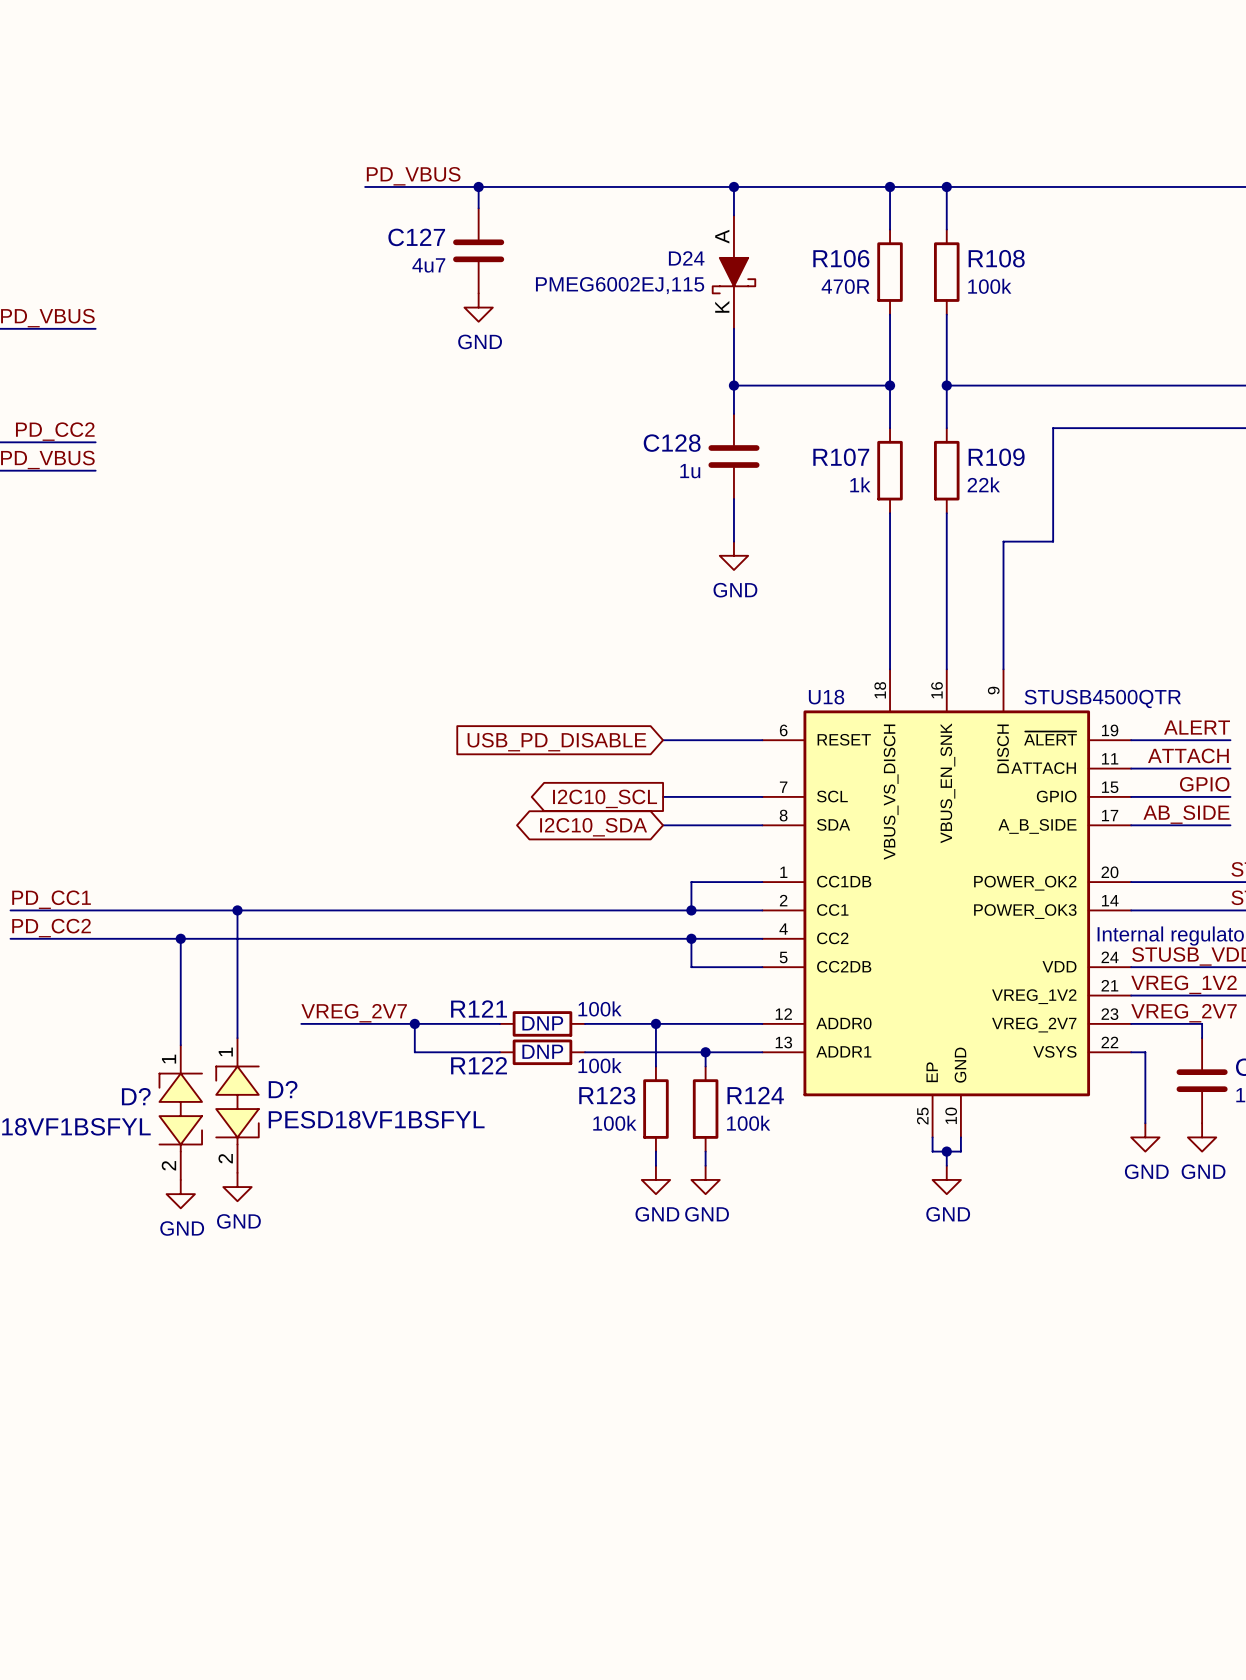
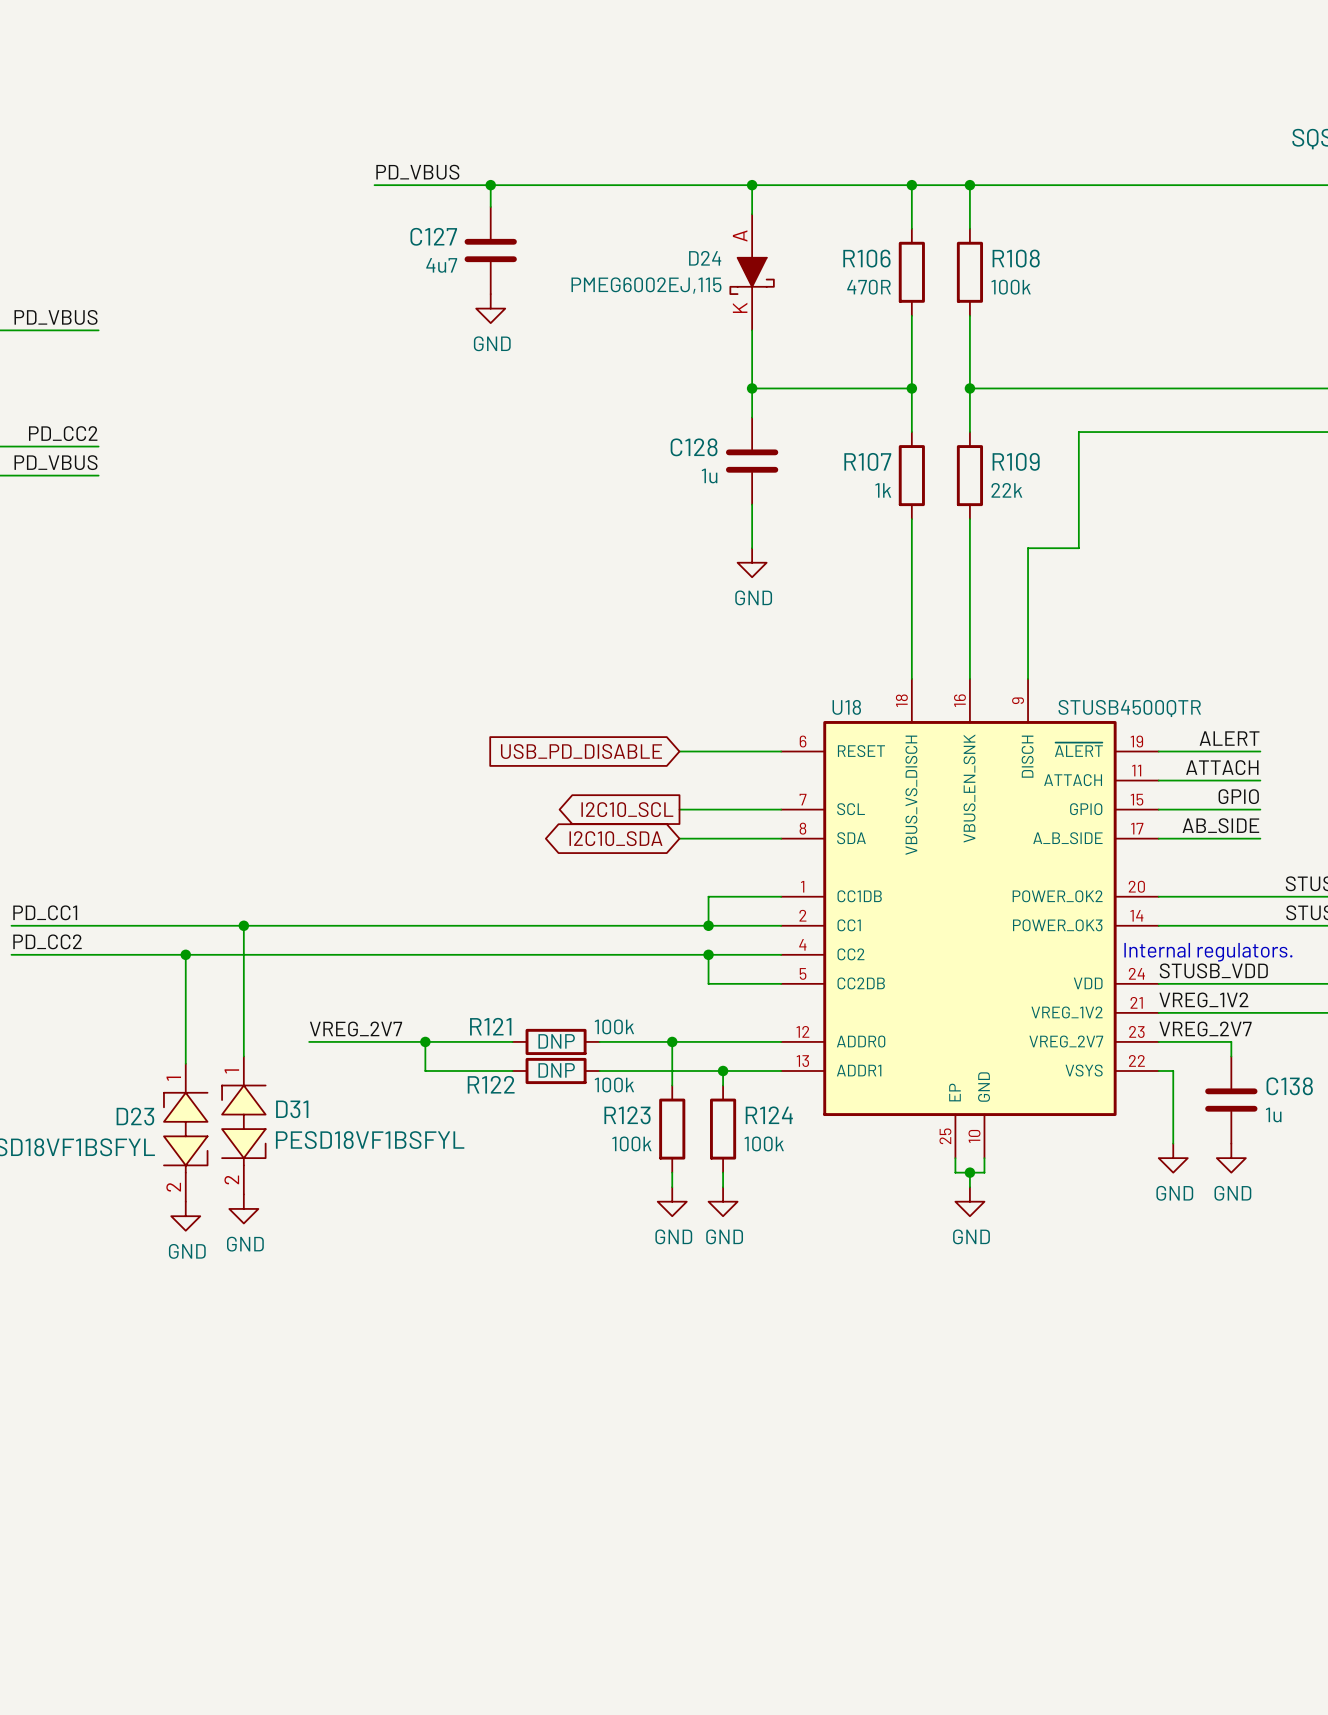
D? name: D? (283, 1089) -> D31 (292, 1109)
D? name: D? (136, 1096) -> D23 (135, 1116)

